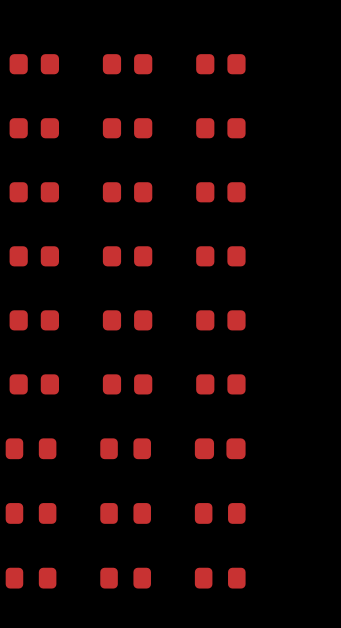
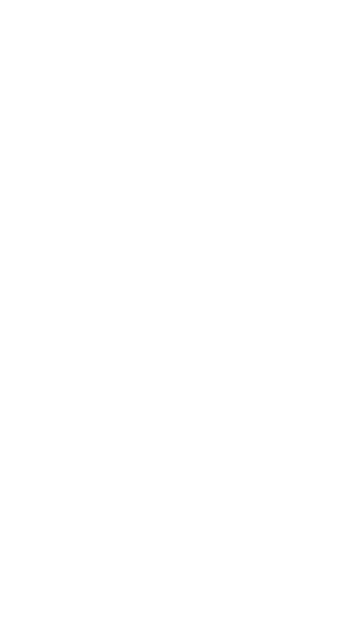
part: (34, 64) -> none
part: (127, 64) -> none
part: (220, 64) -> none
part: (34, 128) -> none
part: (127, 128) -> none
part: (220, 128) -> none
part: (34, 192) -> none
part: (127, 192) -> none
part: (220, 192) -> none
part: (34, 256) -> none
part: (127, 256) -> none
part: (220, 256) -> none
part: (34, 320) -> none
part: (127, 320) -> none
part: (220, 320) -> none
part: (34, 384) -> none
part: (127, 384) -> none
part: (220, 384) -> none
part: (31, 448) -> none
part: (125, 448) -> none
part: (220, 448) -> none
part: (31, 513) -> none
part: (125, 513) -> none
part: (220, 513) -> none
part: (31, 578) -> none
part: (125, 578) -> none
part: (220, 578) -> none

